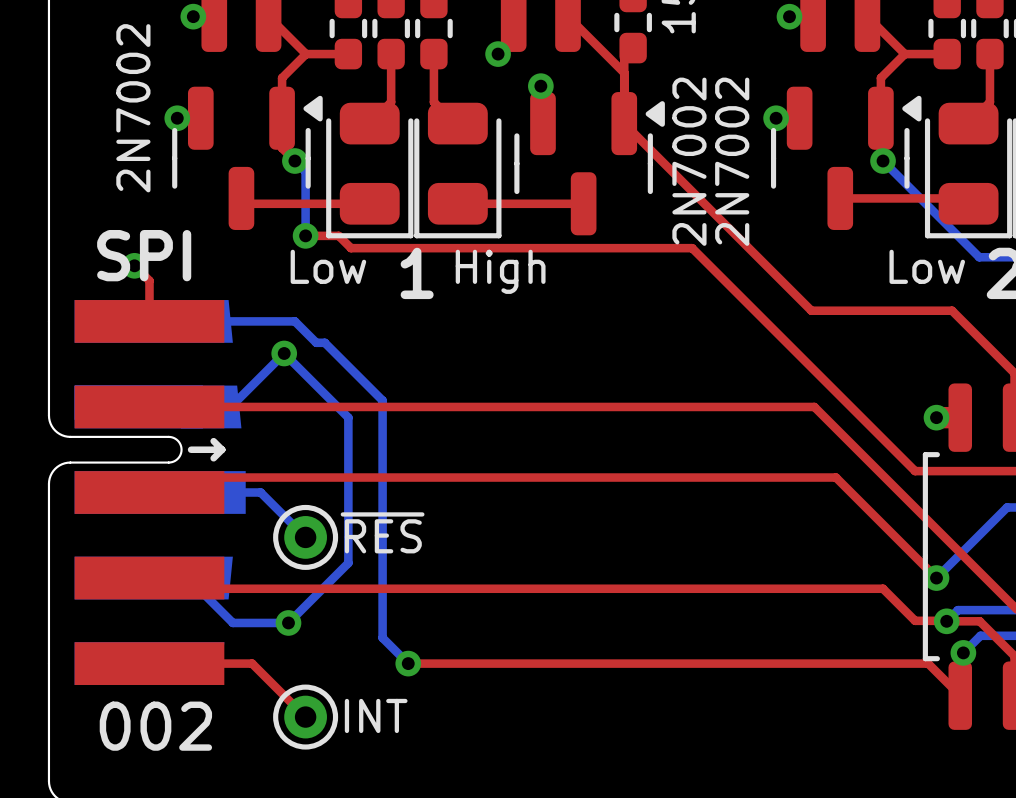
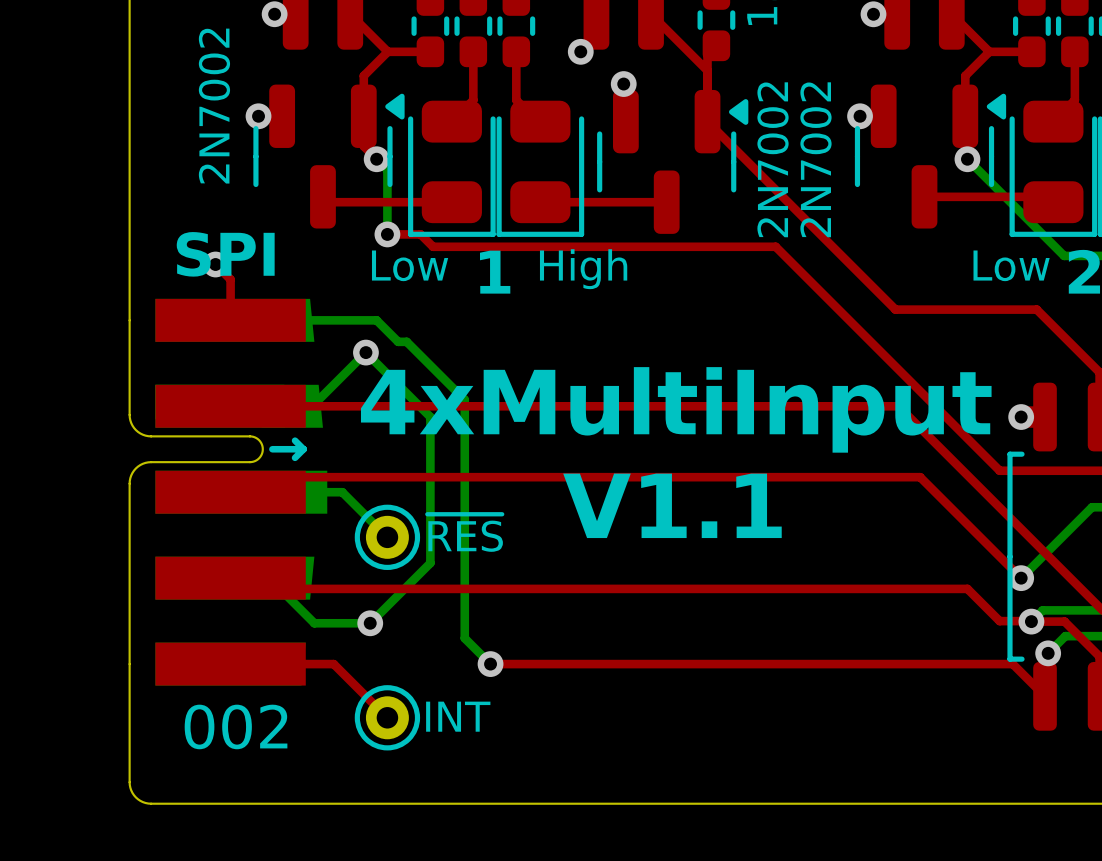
text: none -> 4xMultiInput (676, 409)
text: none -> V1.1 (672, 505)

